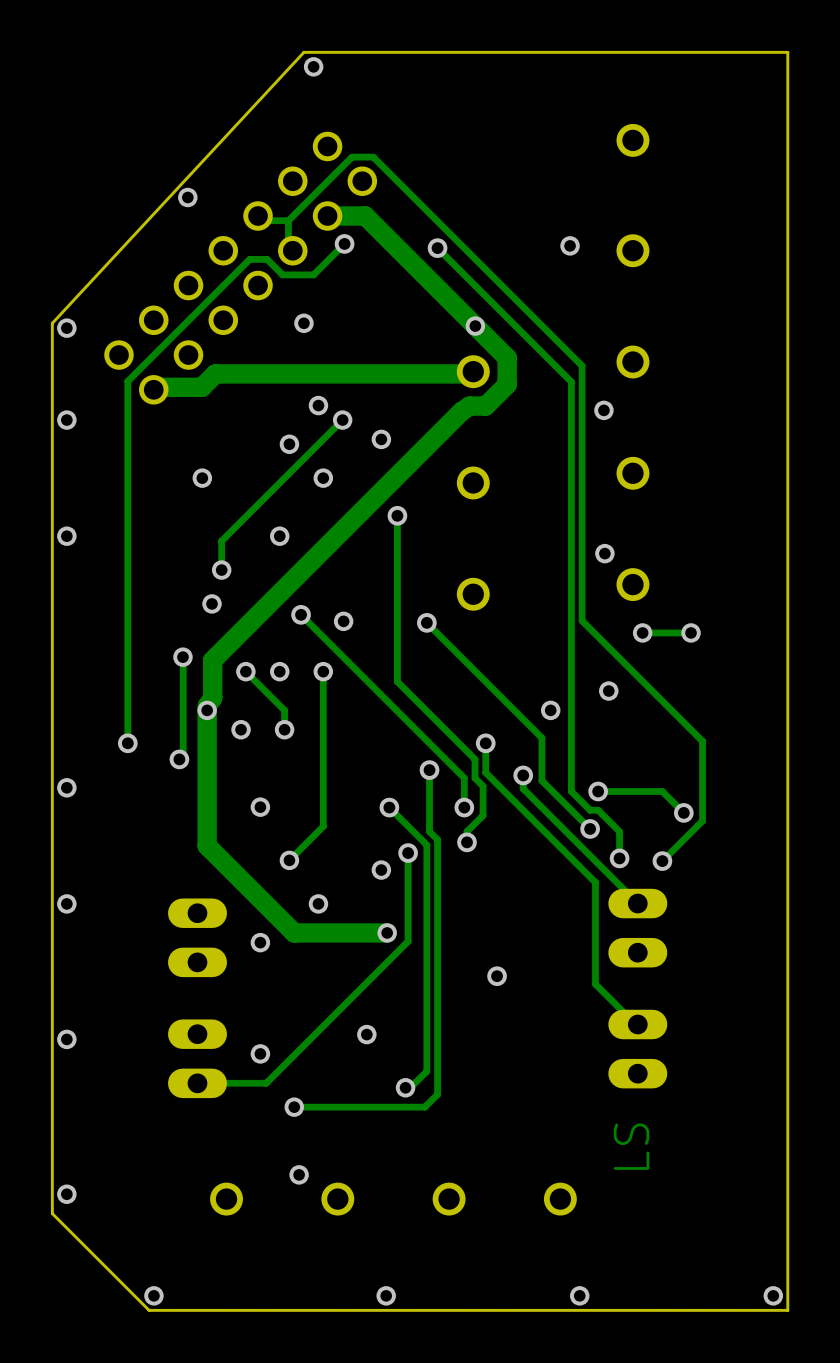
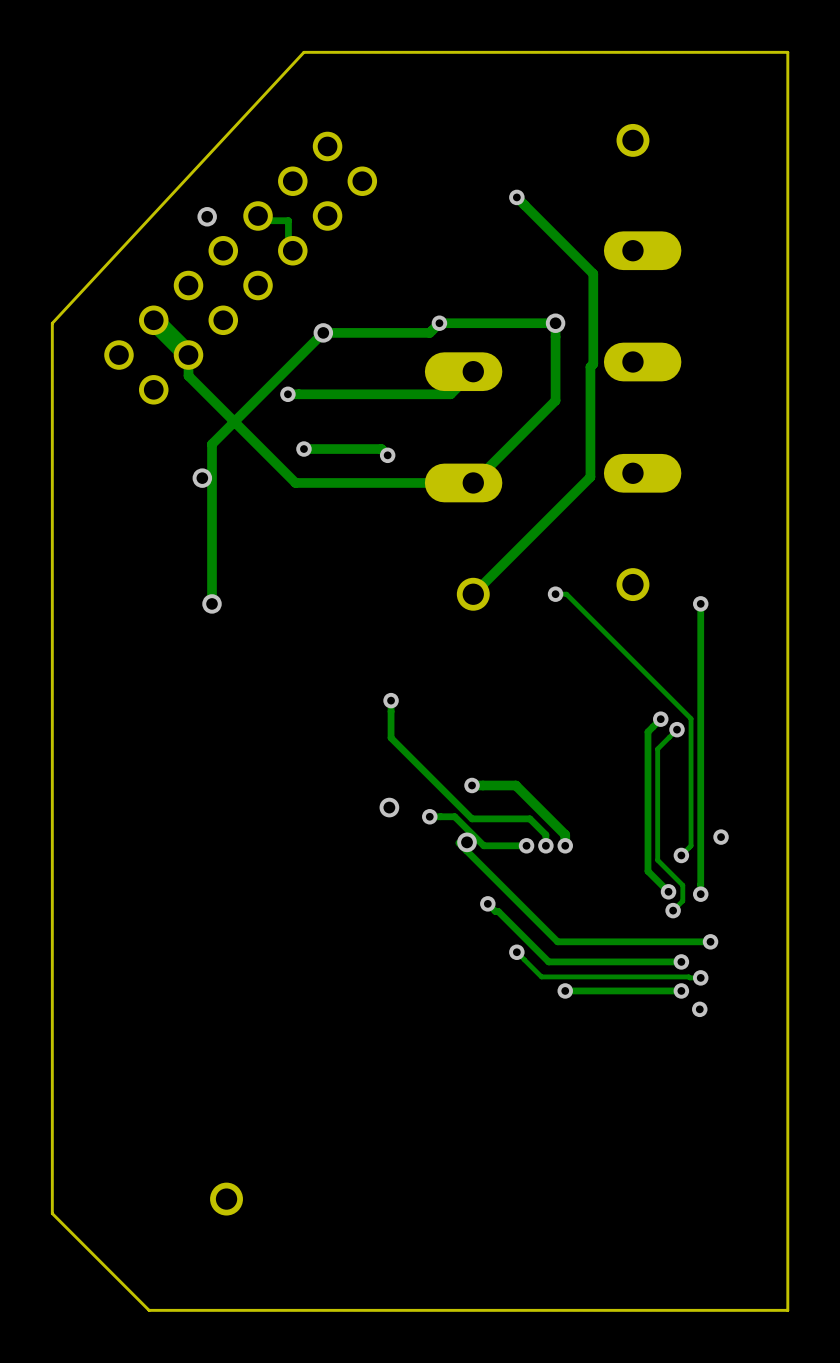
via: (313, 66) -> none
via position: (187, 197) -> (207, 216)
track: none -> (516, 197) (593, 273) (593, 364) (590, 366) (590, 477) (473, 594)
via: none -> (516, 197)
track: (327, 216) (365, 216) (507, 357) (507, 384) (485, 406) (469, 406) (461, 411) (212, 660) (212, 697) (207, 705) (207, 710) (207, 845) (294, 932) (387, 932) -> none
track: (288, 220) (352, 157) (373, 157) (582, 365) (582, 620) (702, 741) (702, 820) (662, 861) -> none
part footprint: [616, 234, 650, 268] -> [603, 231, 682, 271]
track: (344, 243) (313, 274) (282, 274) (267, 259) (249, 259) (127, 381) (127, 743) -> none
via: (344, 243) -> none
via: (570, 245) -> none
track: (437, 248) (571, 381) (571, 791) (590, 810) (598, 810) (619, 831) (619, 858) -> none
via: (437, 248) -> none
track: none -> (153, 320) (188, 355) (188, 375) (295, 482) (473, 482) (555, 400) (555, 323) (439, 323) (429, 332) (323, 332) (212, 444) (212, 603)
via position: (303, 323) -> (323, 332)
via: none -> (439, 323)
via: none -> (555, 323)
via: (475, 326) -> none
via: (66, 328) -> none
part footprint: [616, 345, 650, 379] -> [603, 342, 682, 382]
part footprint: [456, 355, 490, 389] -> [424, 352, 503, 392]
track: (473, 371) (472, 373) (215, 373) (202, 387) (153, 387) (153, 389) -> (473, 371) (450, 394) (287, 394)
via: none -> (287, 394)
via: (318, 405) -> none
via: (603, 410) -> none
via: (66, 420) -> none
track: (342, 420) (221, 541) (221, 570) -> none
via: (342, 420) -> none
via position: (381, 439) -> (387, 455)
via position: (289, 444) -> (303, 449)
track: none -> (303, 449) (381, 449) (387, 455)
part footprint: [616, 456, 650, 490] -> [603, 453, 682, 493]
part footprint: [456, 466, 490, 500] -> [424, 463, 503, 503]
via: (323, 478) -> none
track: (397, 515) (397, 681) (475, 759) (475, 778) (483, 786) (483, 815) (467, 831) (467, 842) -> none
via: (397, 515) -> none
via: (66, 536) -> none
via: (279, 536) -> none
via: (604, 553) -> none
via: (221, 570) -> none
track: none -> (555, 594) (566, 594) (691, 718) (691, 845) (681, 855)
via: none -> (555, 594)
track: none -> (700, 603) (700, 894)
via: none -> (700, 603)
track: (301, 614) (464, 778) (464, 807) -> none
via: (301, 614) -> none
via: (343, 621) -> none
track: (426, 622) (541, 737) (541, 780) (590, 828) -> none
via: (426, 622) -> none
via: (642, 632) -> none
track: (691, 632) (642, 632) -> none
via: (691, 632) -> none
track: (182, 657) (183, 755) (179, 759) -> none
via: (182, 657) -> none
track: (245, 671) (284, 710) (284, 729) -> none
via: (245, 671) -> none
via: (279, 671) -> none
track: (323, 671) (323, 826) (289, 860) -> none
via: (323, 671) -> none
via: (608, 691) -> none
track: none -> (391, 700) (391, 737) (471, 818) (529, 818) (545, 834) (545, 845)
via: none -> (391, 700)
via: (207, 710) -> none
via: (550, 710) -> none
track: none -> (660, 719) (647, 731) (647, 871) (668, 891)
via: none -> (660, 719)
via: (241, 729) -> none
via: (284, 729) -> none
track: none -> (677, 729) (657, 749) (657, 860) (682, 885) (682, 900) (673, 910)
via: none -> (677, 729)
via: (127, 743) -> none
track: (485, 743) (485, 772) (595, 882) (595, 984) (637, 1024) -> none
via: (485, 743) -> none
via: (179, 759) -> none
track: (429, 770) (429, 831) (437, 839) (437, 1094) (424, 1107) (294, 1107) -> none
via: (429, 770) -> none
track: (523, 775) (523, 788) (637, 903) -> none
via: (523, 775) -> none
track: none -> (472, 785) (515, 785) (565, 834) (565, 845)
via: none -> (472, 785)
via: (66, 787) -> none
track: (598, 791) (662, 791) (683, 812) -> none
via: (598, 791) -> none
via: (260, 807) -> none
track: (389, 807) (426, 845) (426, 1071) (410, 1087) (405, 1087) -> none
via: (464, 807) -> none
via: (683, 812) -> none
track: none -> (429, 816) (454, 816) (483, 845) (526, 845)
via: none -> (429, 816)
via: (590, 828) -> none
via: none -> (721, 837)
track: none -> (458, 842) (557, 941) (710, 941)
via: none -> (526, 845)
via: none -> (545, 845)
via: none -> (565, 845)
track: (408, 853) (408, 941) (266, 1083) (197, 1083) -> none
via: (408, 853) -> none
via: none -> (681, 855)
via: (619, 858) -> none
via: (289, 860) -> none
via: (662, 861) -> none
via: (381, 870) -> none
via: none -> (668, 891)
via: none -> (700, 894)
via: (66, 903) -> none
via: (318, 903) -> none
track: none -> (487, 903) (495, 911) (498, 911) (548, 961) (681, 961)
via: none -> (487, 903)
via: none -> (673, 910)
part: (637, 928) -> none
via: (387, 932) -> none
part: (197, 937) -> none
via: none -> (710, 941)
via: (260, 942) -> none
track: none -> (516, 952) (541, 976) (700, 977)
via: none -> (516, 952)
via: none -> (681, 961)
via: (497, 976) -> none
via: none -> (700, 977)
via: none -> (565, 990)
track: none -> (681, 990) (565, 990)
via: none -> (681, 990)
via: none -> (699, 1009)
via: (366, 1034) -> none
via: (66, 1039) -> none
part: (637, 1049) -> none
via: (260, 1053) -> none
part: (197, 1058) -> none
via: (405, 1087) -> none
via: (294, 1107) -> none
text: LS (631, 1146) -> none
via: (299, 1174) -> none
via: (66, 1194) -> none
part: (337, 1199) -> none
part: (449, 1199) -> none
part: (560, 1199) -> none
via: (153, 1295) -> none
via: (386, 1295) -> none
via: (579, 1295) -> none
via: (773, 1295) -> none

